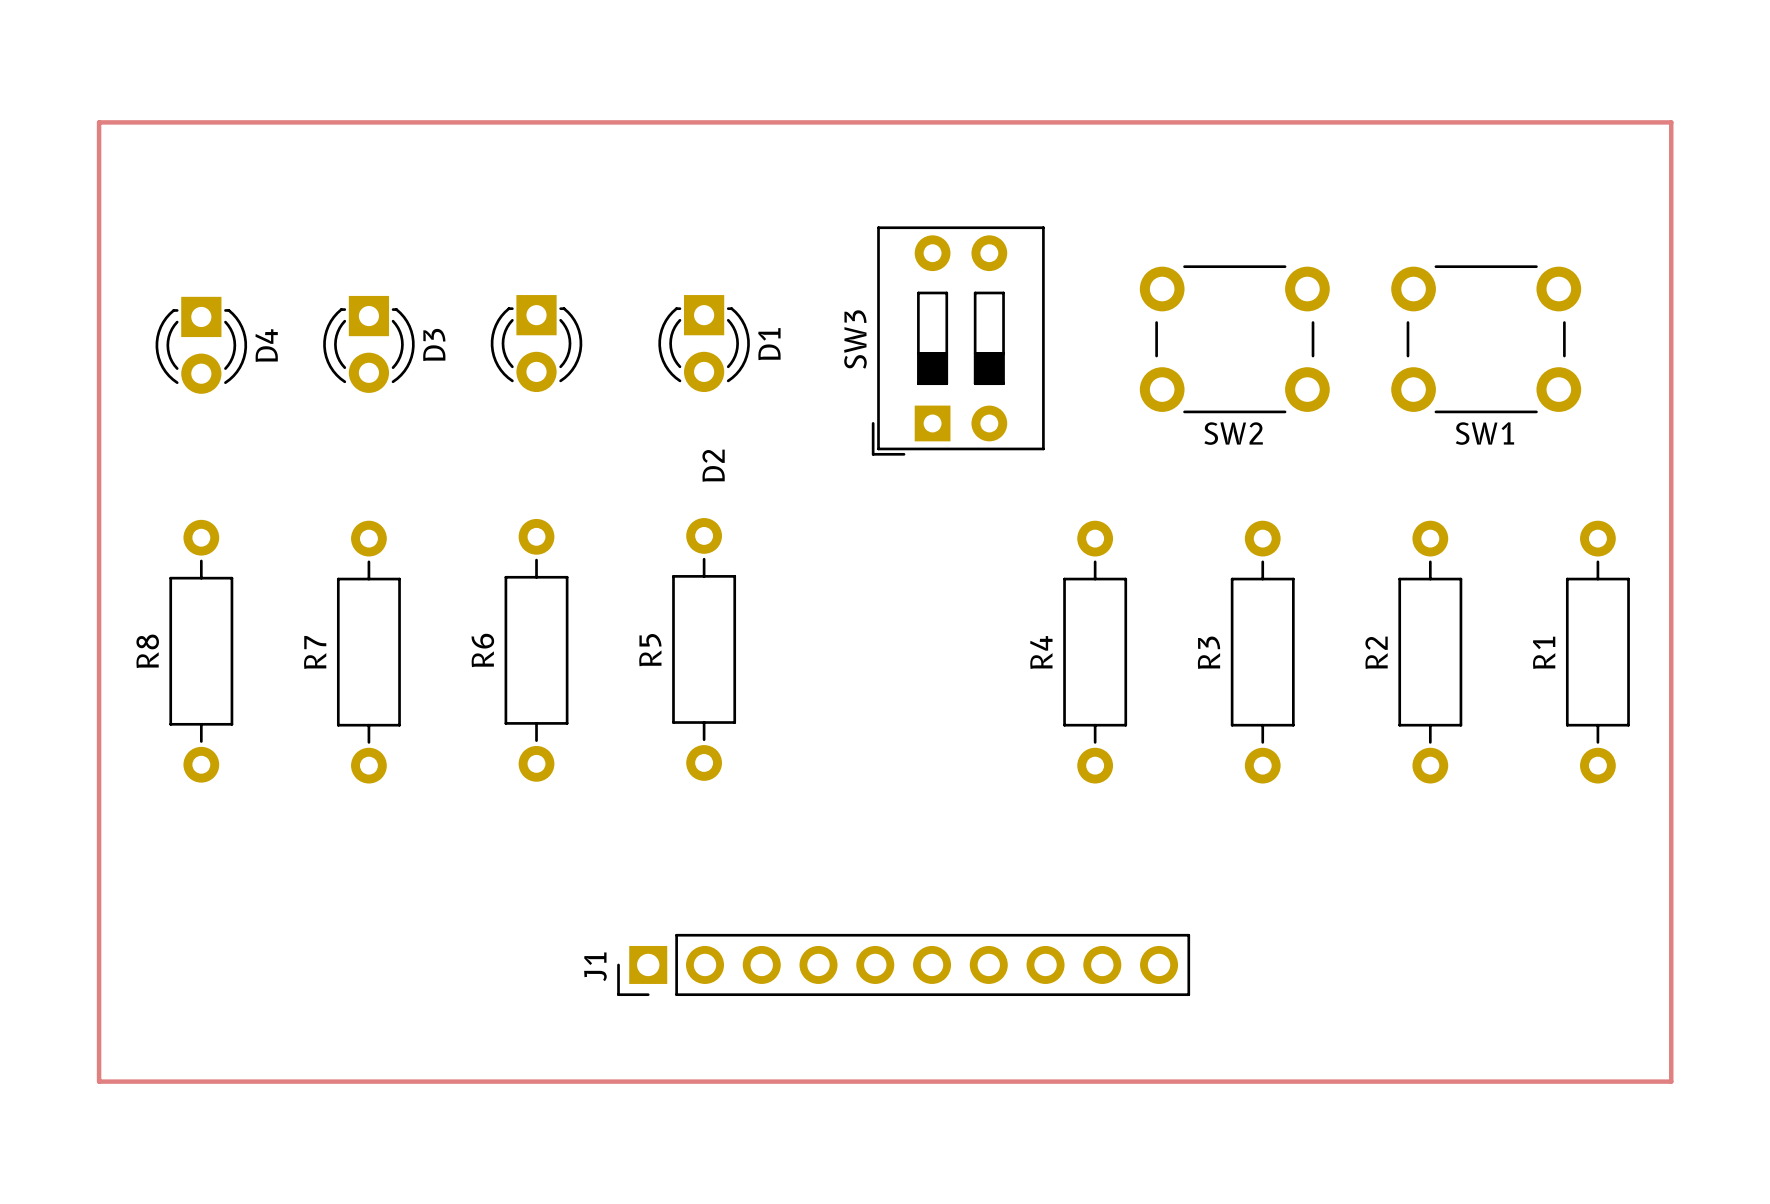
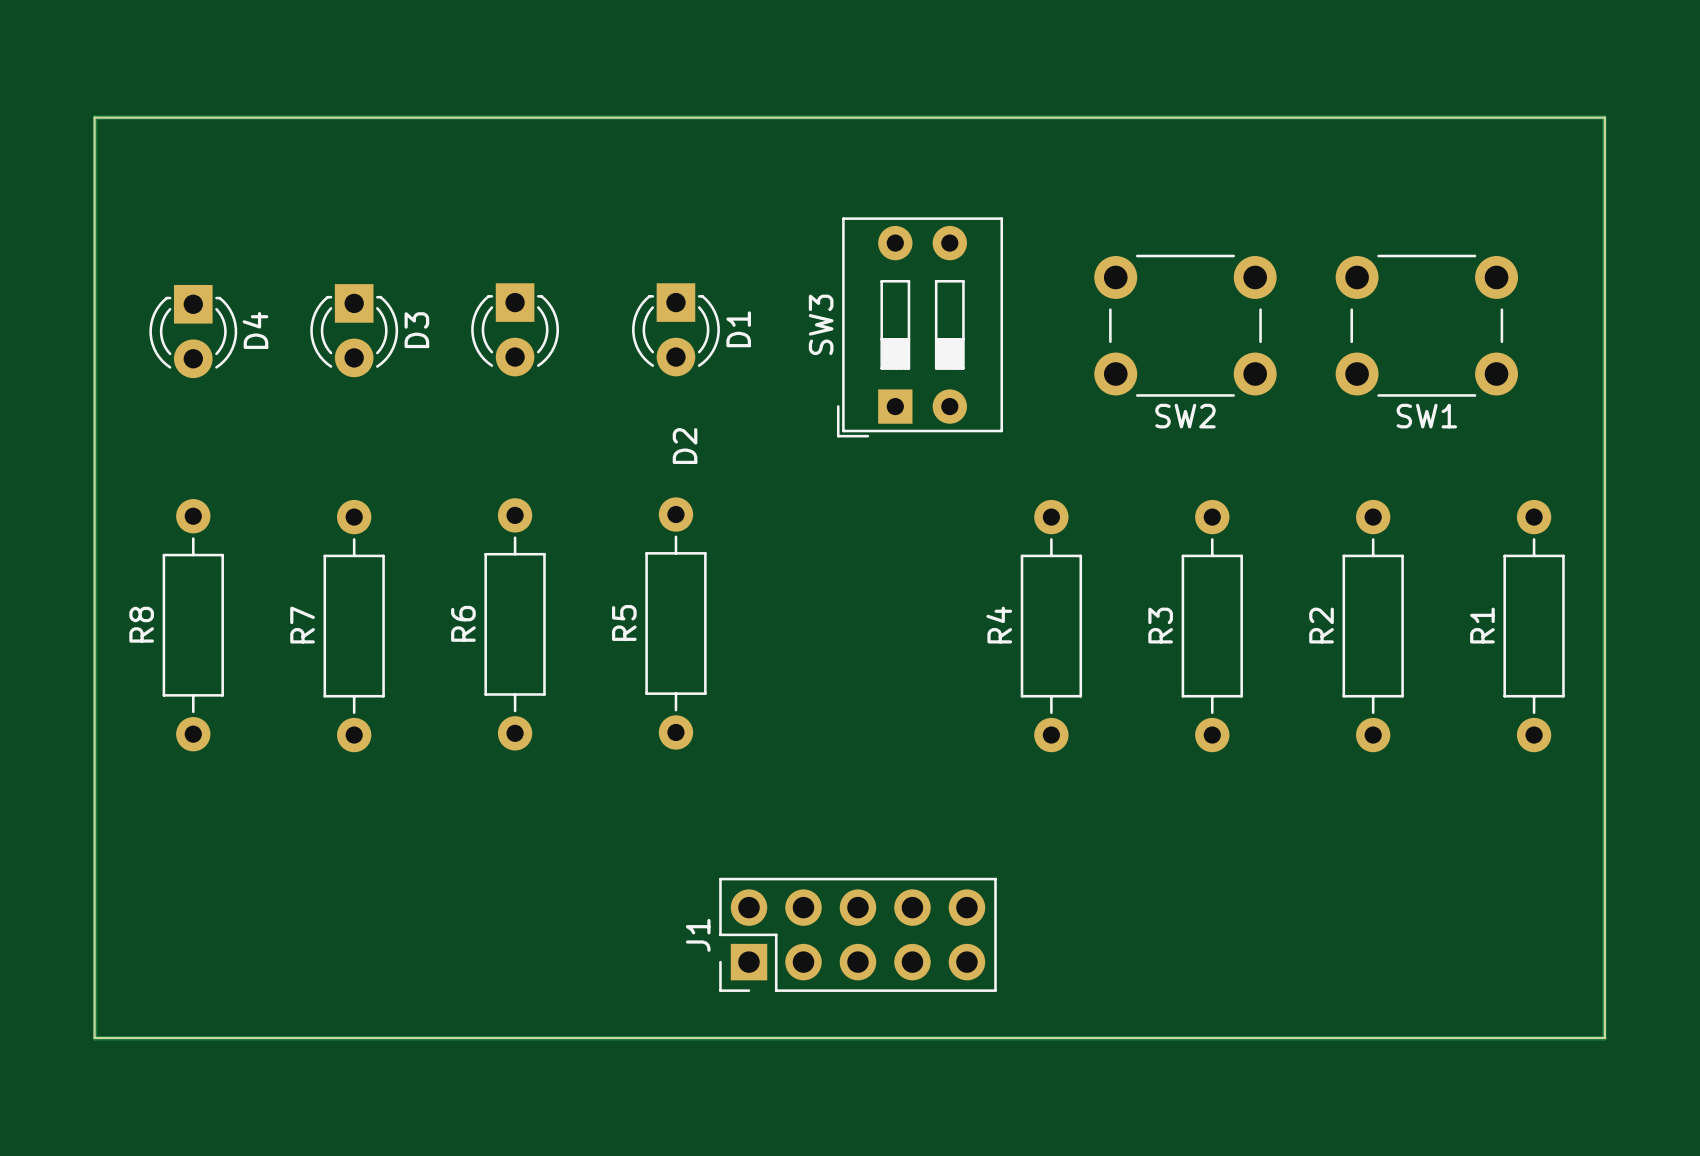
board edge: none -> (94, 117) (1604, 117) (1604, 1037) (94, 1037) (94, 117)
J1 footprint: [617, 933, 1191, 997] -> [719, 877, 997, 992]
J1 name position: J1 (595, 966) -> J1 (698, 935)

